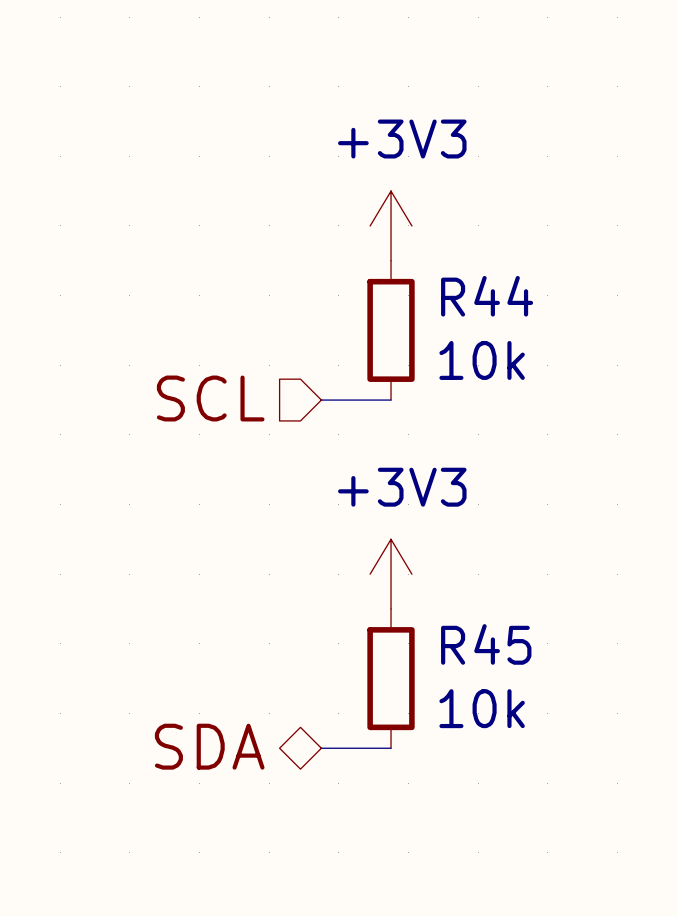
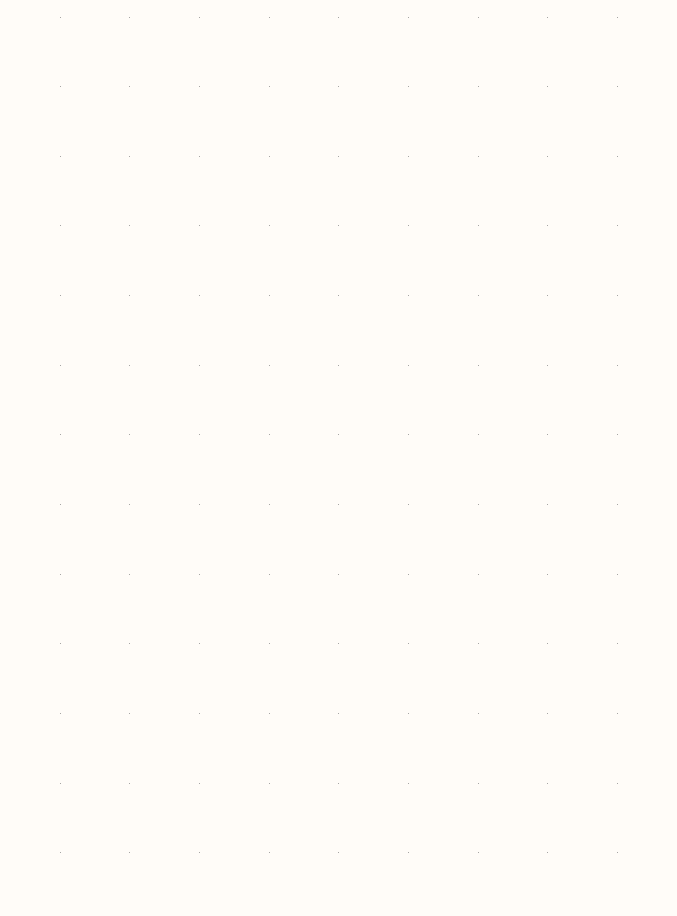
power symbol: +3V3 (391, 225) -> none
R44: 10k (391, 330) -> none
hierarchical label: SCL (210, 398) -> none
wire: (321, 400) (391, 400) -> none
power symbol: +3V3 (391, 574) -> none
R45: 10k (391, 678) -> none
hierarchical label: SDA (209, 746) -> none
wire: (321, 748) (391, 748) -> none

